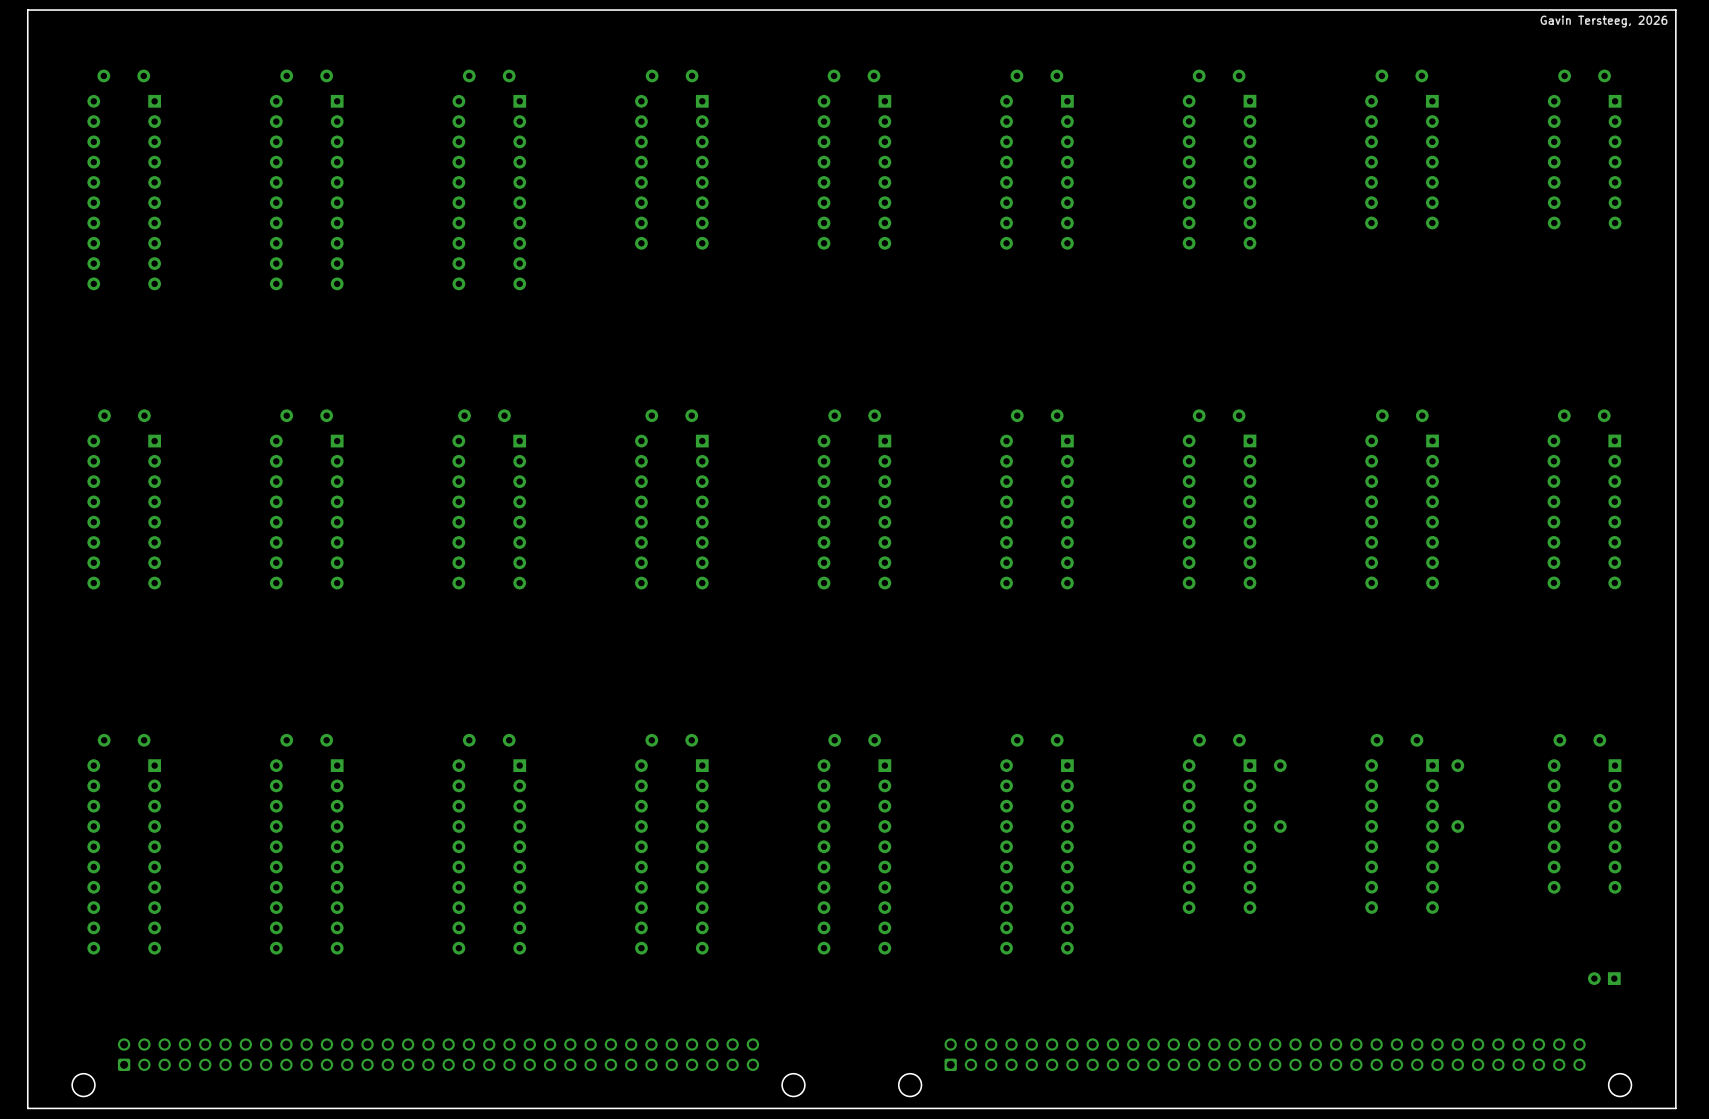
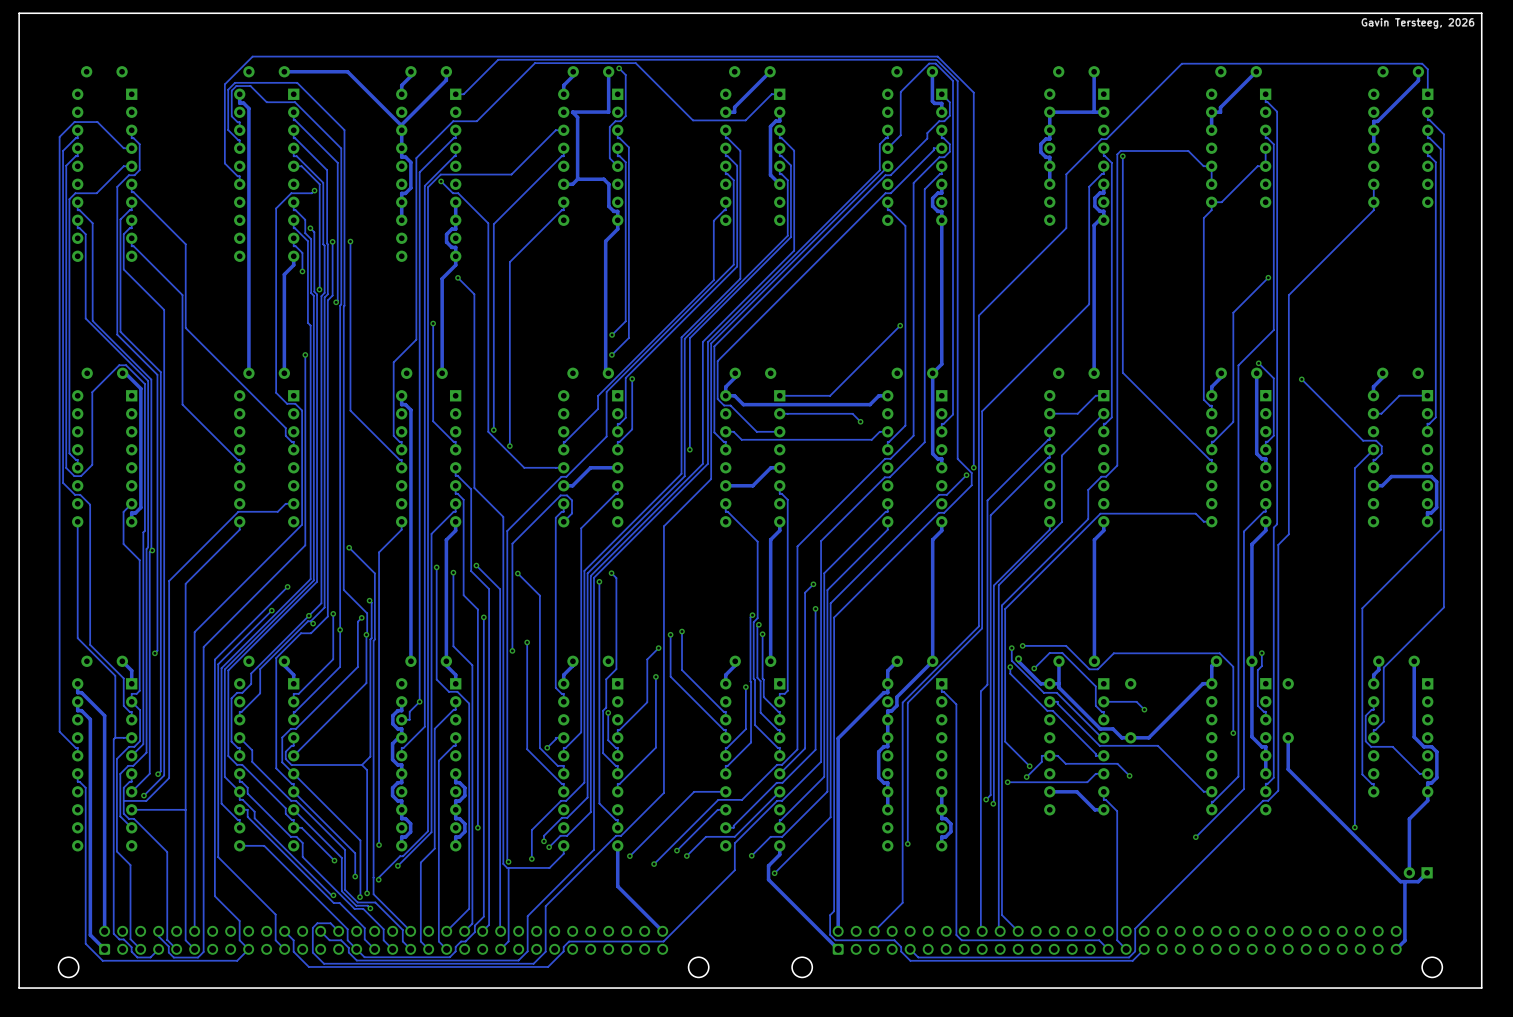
track: none -> (619, 68) (625, 74) (625, 116) (620, 121) (615, 121) (609, 126) (609, 158) (617, 166)
via: none -> (619, 68)
track: none -> (284, 71) (347, 71) (401, 125) (401, 157) (405, 157) (410, 162) (410, 188) (405, 193) (401, 193) (401, 220)
track: none -> (410, 71) (410, 76) (401, 85) (401, 94)
track: none -> (446, 71) (446, 80) (401, 125)
track: none -> (573, 71) (573, 75) (563, 85) (563, 94)
track: none -> (608, 71) (608, 112) (572, 112) (577, 117) (577, 179)
track: none -> (770, 71) (734, 107) (734, 112) (725, 112)
track: none -> (932, 71) (932, 101) (934, 103) (941, 103) (941, 112)
track: none -> (1094, 71) (1094, 112)
track: none -> (1256, 71) (1220, 107) (1220, 112) (1211, 112) (1211, 130)
track: none -> (1418, 71) (1418, 80) (1377, 121) (1373, 121) (1373, 148)
track: none -> (239, 94) (239, 103) (243, 103) (248, 108) (248, 373)
track: none -> (455, 94) (463, 94) (498, 59) (936, 59) (957, 81) (957, 458) (971, 472) (971, 485) (944, 512) (938, 512) (834, 617) (834, 911) (830, 915) (830, 934) (835, 940) (894, 940) (901, 946) (901, 951) (910, 960) (1132, 960) (1144, 949)
track: none -> (779, 94) (771, 94) (745, 120) (693, 120) (635, 63) (535, 63) (476, 121) (453, 121) (416, 158) (416, 339) (393, 362) (393, 435) (401, 441) (401, 449)
track: none -> (941, 94) (949, 102) (949, 115) (944, 121) (939, 121) (927, 133) (927, 138) (890, 175) (885, 175) (714, 346) (714, 432) (725, 441) (725, 449)
track: none -> (1265, 94) (1265, 102) (1277, 111) (1277, 524) (1273, 527) (1273, 777) (1265, 783) (1265, 791)
track: none -> (1427, 94) (1427, 69) (1422, 63) (1181, 63) (1106, 139) (1101, 139) (1066, 174) (1066, 228) (978, 315) (978, 626) (902, 702) (902, 902) (874, 931)
track: none -> (293, 112) (293, 120) (337, 162) (337, 300) (336, 302)
track: none -> (779, 112) (779, 121) (775, 121) (770, 126) (770, 175) (779, 184)
track: none -> (1103, 112) (1049, 112) (1049, 139) (1045, 139) (1040, 144) (1040, 152) (1045, 157) (1049, 157) (1049, 184)
track: none -> (1427, 112) (1427, 120) (1443, 134) (1443, 607) (1383, 667) (1383, 721) (1373, 729) (1373, 737)
track: none -> (77, 130) (77, 138) (63, 150) (63, 482) (74, 494) (80, 494) (90, 504) (90, 644) (123, 678) (123, 705) (131, 711) (131, 719)
track: none -> (131, 130) (131, 138) (139, 144) (139, 170) (134, 175) (128, 175) (117, 186) (117, 334) (157, 374) (157, 650) (154, 653)
track: none -> (239, 130) (239, 122) (231, 116) (231, 90) (236, 86) (250, 86) (266, 102) (295, 102) (341, 148) (340, 666) (293, 711) (293, 719)
track: none -> (293, 130) (293, 138) (327, 170) (327, 294) (324, 297) (324, 607) (310, 621)
track: none -> (455, 130) (455, 138) (419, 172) (419, 701) (409, 711) (409, 719) (401, 719)
track: none -> (563, 130) (555, 130) (511, 174) (440, 174) (427, 187) (427, 831) (403, 856) (400, 856) (378, 879)
track: none -> (617, 130) (617, 138) (628, 147) (628, 337) (611, 354)
track: none -> (725, 130) (725, 138) (740, 150) (740, 278) (681, 337) (681, 473) (584, 570) (584, 782) (566, 800) (561, 800) (531, 830) (531, 858)
track: none -> (779, 130) (779, 138) (794, 150) (794, 250) (702, 341) (702, 463) (590, 575) (590, 812) (567, 835) (560, 835) (549, 847)
track: none -> (887, 130) (887, 138) (879, 144) (879, 170) (707, 342) (707, 463) (593, 577) (593, 849) (527, 916) (527, 951) (518, 960) (356, 960) (341, 940) (329, 940) (320, 931)
track: none -> (941, 130) (941, 138) (949, 144) (949, 151) (944, 157) (939, 157) (913, 183) (913, 435) (890, 458) (885, 458) (797, 546) (797, 749) (782, 764) (777, 764) (742, 799) (718, 799) (654, 864)
track: none -> (1265, 130) (1265, 138) (1273, 144) (1273, 330) (1238, 365) (1238, 776) (1211, 801) (1211, 809)
track: none -> (1427, 130) (1427, 138) (1440, 149) (1440, 529) (1362, 608) (1362, 774) (1373, 783) (1373, 791)
track: none -> (77, 148) (77, 156) (66, 165) (66, 467) (74, 476) (81, 476) (92, 464) (92, 392) (119, 365) (126, 365) (144, 384) (143, 744) (131, 755)
track: none -> (131, 148) (123, 148) (97, 122) (74, 122) (59, 136) (59, 731) (77, 747) (77, 755)
track: none -> (239, 148) (239, 140) (228, 130) (228, 89) (235, 82) (297, 82) (344, 130) (343, 589) (367, 613) (366, 683) (293, 755)
track: none -> (293, 148) (293, 156) (296, 156) (323, 182) (324, 292) (321, 296) (321, 603) (251, 673) (251, 683) (242, 692) (237, 692) (231, 698) (231, 741) (239, 747) (239, 755)
track: none -> (455, 148) (455, 156) (424, 185) (424, 726) (401, 747) (401, 755)
track: none -> (563, 148) (563, 156) (493, 224) (493, 430)
track: none -> (617, 148) (617, 156) (625, 162) (625, 321) (612, 334)
track: none -> (725, 148) (725, 156) (737, 165) (737, 266) (625, 378) (625, 417) (617, 423) (617, 431)
track: none -> (779, 148) (779, 156) (790, 165) (790, 237) (689, 338) (689, 449)
track: none -> (887, 148) (900, 135) (900, 91) (929, 63) (935, 63) (953, 80) (953, 414) (941, 423) (941, 431)
track: none -> (941, 148) (933, 148) (890, 193) (885, 193) (717, 361) (717, 399) (724, 405) (730, 405) (756, 431) (779, 431)
track: none -> (1103, 148) (1103, 156) (1111, 162) (1111, 417) (1103, 423) (1103, 431)
track: none -> (1265, 148) (1265, 166) (1257, 166) (1221, 202) (1211, 202) (1211, 210) (1203, 218) (1203, 399) (1211, 405) (1211, 413)
track: none -> (1427, 148) (1427, 156) (1435, 162) (1435, 417) (1427, 423) (1427, 431)
track: none -> (1122, 156) (1122, 372) (1211, 459) (1211, 467)
via: none -> (1122, 156)
track: none -> (131, 166) (123, 166) (96, 193) (75, 193) (69, 199) (69, 453) (77, 459) (77, 467)
track: none -> (293, 166) (301, 166) (319, 184) (319, 289)
track: none -> (725, 166) (725, 174) (733, 180) (733, 264) (606, 391) (606, 436) (566, 476) (561, 476) (507, 530) (508, 861)
track: none -> (779, 166) (779, 174) (787, 180) (787, 235) (684, 338) (684, 476) (587, 573) (587, 797) (567, 817) (562, 817) (543, 835) (543, 841)
track: none -> (887, 166) (711, 343) (711, 479) (663, 526) (663, 792) (621, 835) (616, 835) (545, 906) (545, 951) (533, 963) (324, 963) (312, 952) (312, 927) (317, 923) (330, 923) (338, 931)
track: none -> (941, 166) (941, 174) (924, 189) (924, 442) (889, 477) (884, 477) (821, 541) (821, 761) (782, 800) (777, 800) (734, 843) (734, 870) (663, 941) (569, 941) (563, 946) (563, 951) (548, 966) (308, 966) (293, 951) (293, 940) (284, 931)
track: none -> (1103, 166) (1103, 174) (1089, 186) (1089, 304) (982, 411) (982, 628) (907, 702) (907, 843)
track: none -> (577, 179) (572, 184) (563, 184)
track: none -> (577, 179) (603, 179) (608, 184) (608, 206) (613, 211) (617, 211) (617, 229) (605, 241) (605, 370) (608, 373)
track: none -> (441, 181) (452, 193) (458, 193) (488, 223) (488, 431) (524, 467) (563, 467)
via: none -> (441, 181)
track: none -> (131, 184) (131, 192) (185, 244) (185, 328) (285, 428) (285, 435) (293, 441) (293, 449)
track: none -> (239, 184) (239, 176) (224, 163) (224, 84) (252, 56) (937, 56) (973, 92) (973, 467)
track: none -> (941, 184) (941, 193) (937, 193) (932, 198) (932, 206) (937, 211) (941, 211) (941, 364) (932, 373) (932, 453) (937, 458) (941, 458) (941, 467)
track: none -> (1103, 184) (1103, 193) (1099, 193) (1094, 198) (1094, 206) (1099, 211) (1103, 211) (1103, 220)
track: none -> (1211, 184) (1211, 166) (1203, 166) (1188, 151) (1120, 151) (1117, 154) (1117, 465) (1106, 476) (1101, 476) (1088, 489) (1088, 519) (1001, 605) (1001, 915) (1018, 931)
track: none -> (1373, 184) (1373, 210) (1288, 295) (1288, 534) (1278, 544) (1278, 790) (1268, 800) (1263, 800) (1135, 928) (1135, 951) (1129, 957) (918, 957) (910, 949)
track: none -> (314, 190) (311, 193) (291, 193) (276, 208) (276, 392) (287, 403) (295, 403) (302, 410) (302, 524) (194, 632) (194, 931)
via: none -> (314, 190)
track: none -> (77, 202) (77, 210) (92, 223) (92, 320) (151, 379) (151, 550)
track: none -> (131, 202) (131, 210) (120, 219) (120, 331) (160, 372) (160, 771) (158, 774)
track: none -> (293, 202) (293, 210) (305, 219) (305, 233) (311, 239) (311, 293) (313, 295) (313, 580) (224, 669) (224, 776) (239, 791) (239, 799) (242, 799) (254, 811) (254, 818) (333, 895)
track: none -> (455, 202) (455, 229) (451, 229) (446, 234) (446, 242) (451, 247) (455, 247) (455, 265) (442, 278) (442, 373)
track: none -> (563, 202) (563, 210) (509, 262) (509, 446)
track: none -> (725, 202) (725, 210) (713, 220) (713, 280) (598, 395) (598, 408) (563, 441) (563, 449)
track: none -> (887, 202) (887, 210) (905, 225) (905, 425) (887, 441) (887, 449)
track: none -> (1103, 215) (1094, 225) (1094, 373)
track: none -> (77, 220) (77, 228) (85, 234) (85, 318) (148, 380) (146, 752) (133, 765) (128, 765) (120, 773) (120, 816) (131, 827)
track: none -> (131, 220) (131, 228) (123, 234) (123, 269) (164, 309) (164, 775) (143, 795)
track: none -> (293, 220) (293, 228) (307, 241) (307, 322) (310, 325) (310, 579) (221, 668) (221, 803) (239, 819) (239, 827)
track: none -> (310, 228) (314, 232) (314, 291) (317, 294) (317, 581) (228, 670) (228, 756) (237, 764) (242, 764) (285, 808) (285, 813) (293, 819) (293, 827) (301, 827) (334, 860)
via: none -> (310, 228)
track: none -> (131, 238) (131, 246) (182, 295) (182, 404) (239, 459) (239, 467)
track: none -> (293, 238) (293, 246) (302, 252) (302, 271)
track: none -> (332, 241) (332, 295) (327, 300) (327, 616) (311, 633) (300, 633) (276, 658) (276, 768) (293, 783) (293, 791) (355, 853) (355, 876)
via: none -> (332, 241)
track: none -> (350, 241) (350, 410) (401, 459) (401, 467)
via: none -> (350, 241)
track: none -> (293, 256) (293, 265) (284, 274) (284, 373)
via: none -> (302, 271)
track: none -> (457, 277) (474, 294) (474, 487) (503, 516) (503, 863) (507, 867) (549, 867) (563, 853) (563, 845)
via: none -> (457, 277)
track: none -> (1268, 277) (1233, 312) (1233, 421) (1211, 441) (1211, 449)
via: none -> (1268, 277)
via: none -> (319, 289)
via: none -> (336, 302)
track: none -> (433, 323) (433, 421) (455, 441) (455, 449)
via: none -> (433, 323)
track: none -> (900, 325) (830, 395) (779, 395)
via: none -> (900, 325)
via: none -> (612, 334)
track: none -> (305, 354) (305, 545) (203, 647) (203, 951) (198, 957) (173, 957) (168, 952) (168, 946) (158, 936) (158, 931)
via: none -> (305, 354)
via: none -> (611, 354)
track: none -> (1258, 363) (1273, 378) (1273, 435) (1265, 441) (1265, 449)
via: none -> (1258, 363)
track: none -> (122, 373) (125, 373) (140, 388) (140, 507) (135, 512) (131, 512) (131, 521)
track: none -> (735, 373) (735, 377) (725, 386) (725, 395) (734, 395) (743, 404) (870, 404) (878, 395) (887, 395)
track: none -> (1221, 373) (1221, 377) (1211, 386) (1211, 395)
track: none -> (1256, 373) (1256, 453) (1261, 458) (1265, 458) (1265, 467)
track: none -> (1382, 373) (1382, 377) (1373, 386) (1373, 395)
track: none -> (632, 378) (632, 429) (617, 441) (617, 449)
via: none -> (632, 378)
track: none -> (1301, 379) (1363, 440) (1376, 440) (1381, 446) (1381, 453) (1373, 459) (1373, 467)
via: none -> (1301, 379)
track: none -> (1103, 395) (1095, 395) (1077, 413) (1049, 413)
track: none -> (1427, 395) (1399, 395) (1381, 413) (1373, 413)
track: none -> (401, 395) (401, 404) (405, 404) (410, 410) (410, 661)
track: none -> (779, 413) (852, 413) (860, 421)
track: none -> (1103, 413) (1061, 455) (1061, 522) (998, 585) (1000, 931)
via: none -> (860, 421)
via: none -> (493, 430)
track: none -> (887, 431) (879, 431) (871, 439) (741, 439) (733, 431) (725, 431)
track: none -> (1049, 431) (1049, 439) (987, 500) (987, 684) (980, 691) (982, 931)
via: none -> (509, 446)
via: none -> (689, 449)
track: none -> (1049, 449) (1049, 457) (990, 515) (990, 795) (986, 799)
track: none -> (1373, 449) (1354, 468) (1354, 827)
track: none -> (455, 467) (455, 475) (471, 489) (471, 571) (489, 589) (489, 924) (482, 931)
track: none -> (617, 467) (590, 467) (572, 485) (563, 485)
track: none -> (779, 467) (770, 467) (752, 485) (725, 485)
via: none -> (973, 467)
track: none -> (966, 475) (946, 494) (939, 494) (830, 603) (830, 817) (774, 873)
via: none -> (966, 475)
track: none -> (455, 485) (455, 493) (463, 499) (463, 595) (477, 609) (477, 827)
track: none -> (617, 485) (617, 493) (581, 528) (581, 732) (563, 747) (563, 755)
track: none -> (779, 485) (779, 493) (787, 499) (787, 690) (784, 693) (779, 693) (779, 701)
track: none -> (1373, 485) (1382, 485) (1391, 476) (1431, 476) (1436, 481) (1436, 507) (1431, 512) (1427, 512) (1427, 521)
track: none -> (131, 503) (123, 511) (123, 544) (139, 560) (139, 690) (136, 693) (131, 693) (131, 701) (140, 710) (140, 741) (134, 746) (129, 746) (116, 758) (116, 851) (130, 865) (130, 939) (140, 949)
track: none -> (293, 503) (285, 503) (277, 511) (238, 511) (169, 581) (169, 778) (146, 800) (123, 800)
track: none -> (455, 503) (455, 511) (431, 533) (431, 832) (397, 865)
track: none -> (563, 503) (563, 511) (555, 517) (555, 687) (563, 693) (563, 701)
track: none -> (725, 503) (725, 511) (757, 541) (757, 618) (753, 622) (755, 725) (779, 747) (779, 755)
track: none -> (887, 503) (887, 511) (824, 573) (824, 776) (779, 819) (779, 827)
track: none -> (1265, 503) (1265, 511) (1243, 531) (1243, 789) (1195, 837)
track: none -> (1049, 521) (1049, 529) (993, 585) (993, 803)
track: none -> (1103, 521) (1103, 530) (1094, 539) (1094, 661)
track: none -> (1211, 521) (1203, 521) (1195, 513) (1100, 513) (1005, 609) (1005, 741) (1029, 766)
track: none -> (1265, 521) (1265, 530) (1251, 544) (1251, 736) (1261, 746) (1265, 746) (1265, 773)
track: none -> (77, 521) (77, 638) (115, 675) (115, 737)
track: none -> (239, 521) (239, 529) (185, 583) (185, 940) (194, 949)
track: none -> (401, 521) (401, 529) (379, 552) (379, 845)
track: none -> (455, 521) (455, 530) (446, 539) (446, 665) (455, 674) (455, 683)
track: none -> (563, 521) (571, 513) (571, 500) (567, 495) (560, 495) (512, 543) (512, 650)
track: none -> (779, 521) (779, 530) (770, 539) (770, 661)
track: none -> (887, 521) (887, 529) (827, 590) (827, 791) (782, 836) (770, 836) (751, 855)
track: none -> (941, 521) (941, 530) (932, 539) (932, 661) (896, 697) (896, 705) (891, 710) (887, 710) (887, 746) (883, 746) (878, 751) (878, 777) (883, 782) (887, 782) (887, 809)
track: none -> (349, 547) (374, 573) (373, 894) (410, 931)
via: none -> (349, 547)
track: none -> (151, 550) (149, 552) (149, 773) (131, 791)
via: none -> (152, 550)
track: none -> (476, 565) (500, 589) (500, 931)
via: none -> (476, 565)
track: none -> (436, 567) (436, 679) (448, 691) (457, 691) (469, 703) (469, 908) (446, 931)
via: none -> (436, 567)
track: none -> (453, 572) (453, 646) (472, 665) (472, 923) (464, 931)
via: none -> (453, 572)
track: none -> (611, 573) (616, 578) (616, 669) (606, 679) (606, 707) (603, 710) (603, 753) (617, 765) (617, 773)
via: none -> (611, 573)
track: none -> (517, 573) (539, 595) (539, 748) (557, 765) (563, 765) (563, 773)
via: none -> (517, 573)
track: none -> (599, 581) (599, 803) (617, 819) (617, 827)
via: none -> (599, 581)
track: none -> (813, 584) (805, 592) (805, 748) (779, 773)
via: none -> (813, 584)
track: none -> (287, 586) (214, 659) (214, 896) (239, 920) (239, 940) (248, 949) (237, 960) (102, 960) (85, 943) (85, 787) (77, 781) (77, 773)
via: none -> (287, 586)
track: none -> (369, 600) (371, 602) (370, 756) (361, 764)
via: none -> (369, 600)
track: none -> (815, 608) (815, 749) (782, 782) (776, 782) (733, 827) (725, 827)
via: none -> (815, 608)
track: none -> (271, 610) (218, 664) (218, 857) (275, 914) (275, 940) (284, 949)
via: none -> (271, 610)
track: none -> (333, 613) (333, 659) (298, 693) (293, 693) (293, 701)
via: none -> (333, 613)
via: none -> (308, 615)
track: none -> (752, 615) (750, 617) (751, 742) (725, 765) (725, 773)
via: none -> (752, 615)
track: none -> (483, 617) (483, 916) (474, 925) (474, 932) (465, 941) (461, 941) (449, 957) (364, 957) (347, 940) (347, 929) (264, 845) (239, 845)
via: none -> (483, 617)
track: none -> (361, 617) (357, 621) (357, 666) (296, 728) (290, 728) (282, 737) (282, 762) (360, 840) (360, 897)
via: none -> (361, 617)
track: none -> (310, 621) (307, 621) (260, 669) (260, 693) (239, 711) (239, 719)
via: none -> (313, 623)
track: none -> (758, 624) (757, 677) (760, 681) (760, 712) (779, 729) (779, 737)
via: none -> (758, 624)
via: none -> (340, 629)
track: none -> (682, 631) (682, 670) (725, 711) (725, 719)
via: none -> (682, 631)
track: none -> (762, 634) (763, 697) (779, 711) (779, 719)
via: none -> (762, 634)
via: none -> (366, 634)
track: none -> (670, 634) (670, 676) (725, 729) (725, 737)
via: none -> (670, 634)
track: none -> (527, 642) (527, 749) (563, 783) (563, 791)
via: none -> (527, 642)
track: none -> (1022, 645) (1066, 645) (1089, 669) (1097, 669) (1113, 653) (1219, 653) (1233, 666) (1233, 733)
via: none -> (1022, 645)
track: none -> (658, 648) (647, 659) (647, 702) (617, 729) (617, 737)
via: none -> (658, 648)
track: none -> (1011, 648) (1011, 660) (1043, 692) (1056, 692) (1103, 737)
via: none -> (1011, 648)
via: none -> (512, 650)
via: none -> (154, 653)
track: none -> (1261, 653) (1261, 666) (1257, 670) (1257, 705) (1265, 711) (1265, 719)
via: none -> (1261, 653)
track: none -> (1018, 658) (1018, 661) (1040, 683) (1058, 683)
via: none -> (1018, 658)
track: none -> (122, 661) (131, 670) (131, 683)
track: none -> (284, 661) (284, 665) (293, 674) (293, 683)
track: none -> (572, 661) (572, 665) (563, 674) (563, 683)
track: none -> (735, 661) (735, 665) (725, 674) (725, 683)
track: none -> (897, 661) (887, 670) (887, 692) (883, 692) (838, 738) (838, 931)
track: none -> (1216, 661) (1211, 666) (1211, 683) (1202, 683) (1148, 737) (1121, 737) (1112, 728) (1100, 728) (1058, 687) (1058, 661)
track: none -> (1378, 661) (1378, 669) (1373, 674) (1373, 683)
track: none -> (1414, 661) (1414, 737) (1423, 746) (1431, 746) (1436, 751) (1436, 777) (1431, 782) (1427, 782) (1427, 800) (1409, 819) (1409, 872)
track: none -> (1010, 667) (1010, 673) (1047, 710) (1052, 710) (1095, 755) (1103, 755)
via: none -> (1010, 667)
track: none -> (1034, 668) (1049, 653) (1062, 653) (1095, 686) (1095, 705) (1103, 711) (1103, 719)
via: none -> (1034, 668)
track: none -> (655, 676) (655, 747) (617, 783) (617, 791)
via: none -> (655, 676)
track: none -> (77, 683) (77, 692) (81, 692) (104, 715) (104, 931)
track: none -> (941, 683) (941, 691) (956, 704) (956, 935) (961, 940) (1099, 940) (1108, 949)
track: none -> (745, 687) (745, 729) (725, 747) (725, 755)
via: none -> (745, 687)
track: none -> (77, 701) (77, 710) (81, 710) (90, 719) (90, 935) (104, 949)
track: none -> (401, 701) (401, 710) (397, 710) (392, 715) (392, 723) (397, 728) (401, 728) (401, 737)
via: none -> (419, 701)
track: none -> (455, 701) (455, 709) (434, 728) (434, 848) (420, 862) (420, 941) (428, 949)
track: none -> (1049, 701) (1057, 701) (1099, 745) (1157, 745) (1203, 791) (1211, 791)
track: none -> (1103, 701) (1136, 701) (1144, 709)
track: none -> (1373, 701) (1373, 709) (1365, 715) (1365, 741) (1371, 746) (1392, 746) (1419, 773) (1427, 773)
via: none -> (1144, 709)
track: none -> (608, 712) (608, 740) (617, 747) (617, 755)
via: none -> (608, 712)
via: none -> (1233, 733)
track: none -> (401, 734) (392, 743) (392, 759) (397, 764) (401, 764) (401, 782) (397, 782) (392, 787) (392, 795) (397, 800) (401, 800) (401, 818) (405, 818) (410, 823) (410, 831) (405, 836) (401, 836) (401, 845)
track: none -> (115, 737) (113, 739) (113, 933) (119, 939) (123, 939) (131, 947) (131, 951) (137, 957) (150, 957) (158, 949)
track: none -> (131, 737) (115, 737)
track: none -> (239, 737) (252, 750) (252, 761) (291, 800) (296, 800) (345, 849) (345, 889) (357, 902) (375, 902) (402, 929) (402, 941) (410, 949)
track: none -> (293, 737) (293, 745) (285, 751) (285, 759) (291, 764) (361, 764)
track: none -> (455, 737) (455, 745) (438, 760) (438, 941) (446, 949)
track: none -> (563, 737) (555, 737) (547, 747)
track: none -> (1288, 737) (1288, 769) (1400, 881) (1418, 881) (1427, 872)
via: none -> (547, 747)
track: none -> (361, 764) (367, 770) (367, 893)
via: none -> (1029, 766)
track: none -> (131, 773) (131, 781) (123, 787) (123, 813) (128, 818) (134, 818) (167, 852) (167, 939) (176, 949)
via: none -> (158, 774)
track: none -> (239, 773) (239, 781) (247, 787) (247, 793) (290, 836) (296, 836) (302, 842) (302, 856) (354, 908) (363, 908) (383, 929) (383, 940) (392, 949)
track: none -> (455, 773) (455, 782) (459, 782) (464, 787) (464, 795) (459, 800) (455, 800) (455, 818) (459, 818) (464, 823) (464, 831) (459, 836) (455, 836) (455, 845)
track: none -> (1103, 773) (1095, 773) (1087, 782) (1007, 782)
track: none -> (1129, 775) (1117, 763) (1065, 763) (1057, 755) (1041, 755) (1041, 761) (1026, 777)
via: none -> (1129, 775)
via: none -> (1026, 777)
via: none -> (1007, 782)
track: none -> (725, 791) (694, 791) (629, 856)
track: none -> (779, 791) (734, 836) (706, 836) (686, 855)
track: none -> (941, 791) (941, 818) (945, 818) (950, 823) (950, 831) (945, 836) (941, 836) (941, 845)
track: none -> (1049, 791) (1076, 791) (1094, 809) (1103, 809)
track: none -> (1103, 791) (1103, 799) (1117, 811) (1117, 940) (1126, 949)
via: none -> (143, 795)
via: none -> (986, 799)
via: none -> (993, 803)
track: none -> (185, 809) (131, 809)
track: none -> (239, 809) (247, 809) (247, 816) (333, 903) (339, 903) (364, 928) (364, 939) (374, 949)
track: none -> (293, 809) (341, 857) (341, 891) (356, 905) (367, 905) (370, 908)
track: none -> (725, 809) (717, 809) (676, 850)
via: none -> (477, 827)
via: none -> (1354, 827)
via: none -> (1195, 837)
via: none -> (543, 841)
via: none -> (907, 843)
via: none -> (379, 845)
track: none -> (617, 845) (617, 886) (662, 931)
track: none -> (779, 845) (779, 854) (768, 865) (768, 879) (838, 949)
via: none -> (549, 847)
via: none -> (676, 850)
via: none -> (629, 856)
via: none -> (686, 855)
via: none -> (751, 855)
via: none -> (531, 858)
via: none -> (334, 860)
via: none -> (508, 861)
via: none -> (654, 864)
via: none -> (397, 865)
track: none -> (508, 867) (508, 941) (500, 949)
via: none -> (774, 873)
via: none -> (355, 876)
via: none -> (378, 879)
track: none -> (1404, 881) (1404, 940) (1396, 949)
via: none -> (367, 893)
via: none -> (333, 895)
via: none -> (360, 897)
via: none -> (370, 908)

